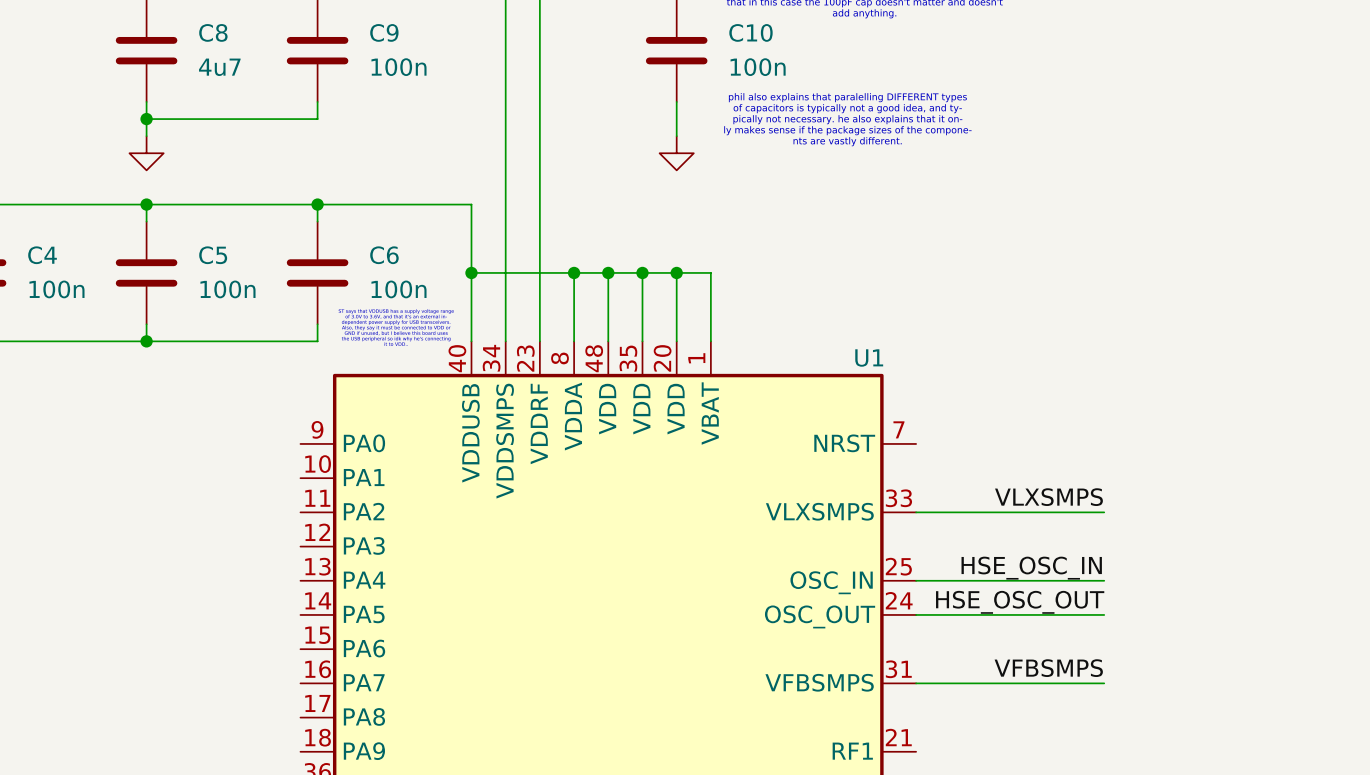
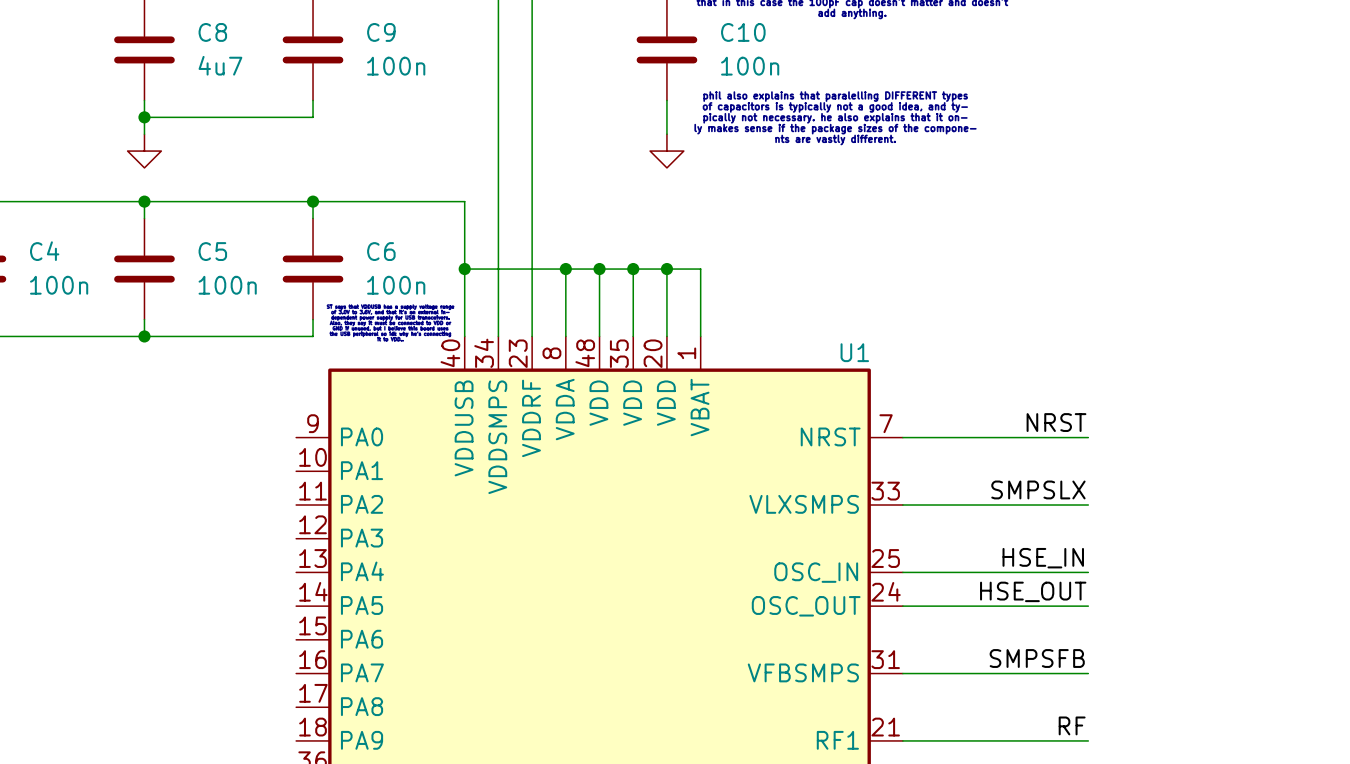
label: none -> NRST (1056, 422)
wire: none -> (902, 437) (1088, 437)
label: VLXSMPS (1048, 497) -> SMPSLX (1038, 489)
label: HSE_OSC_IN (1031, 568) -> HSE_IN (1043, 558)
label: HSE_OSC_OUT (1020, 602) -> HSE_OUT (1033, 591)
label: VFBSMPS (1048, 668) -> SMPSFB (1037, 658)
label: none -> RF (1072, 725)
wire: none -> (902, 740) (1088, 740)

